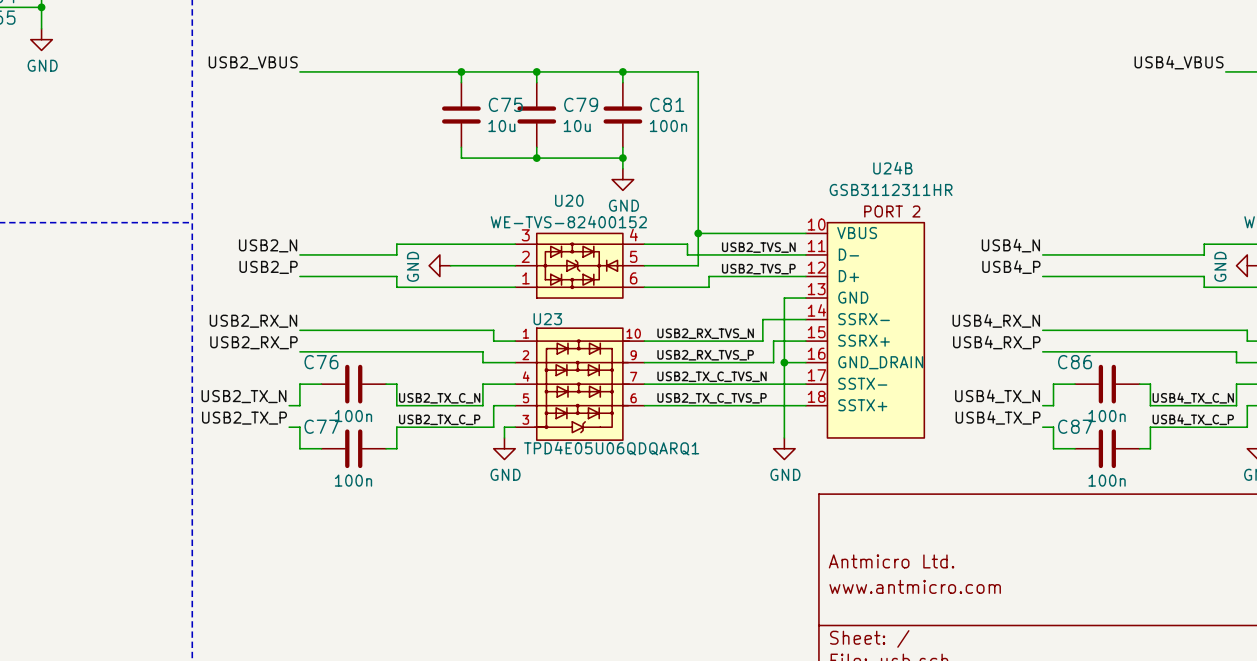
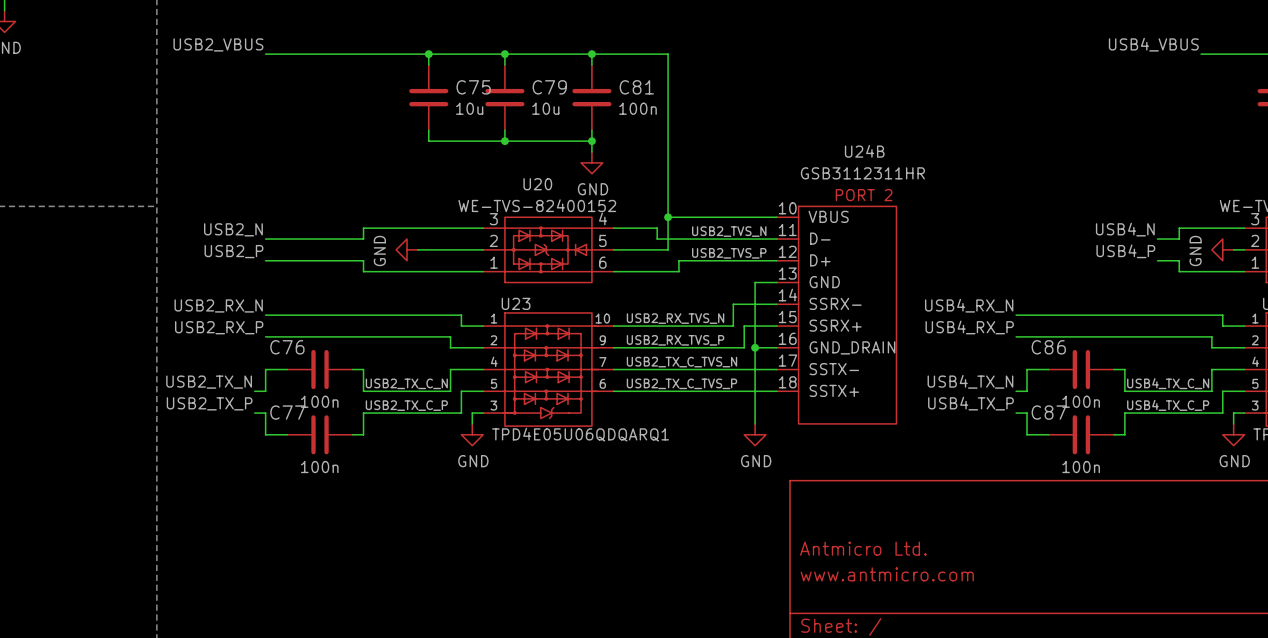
label position: USB4_N (1010, 245) -> USB4_N (1125, 229)
wire: (1042, 254) (1182, 254) -> none
label position: USB4_P (1011, 267) -> USB4_P (1125, 251)
wire: (1042, 276) (1182, 276) -> none

